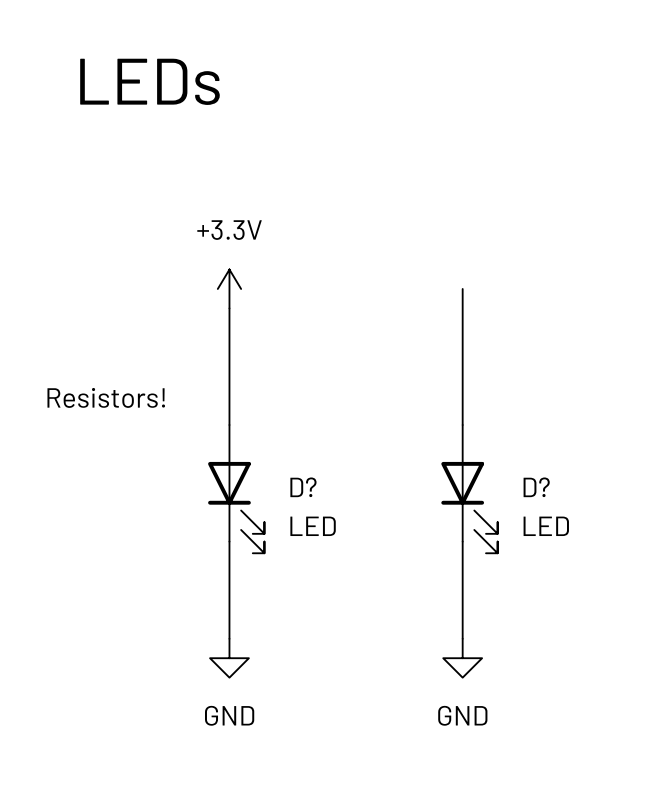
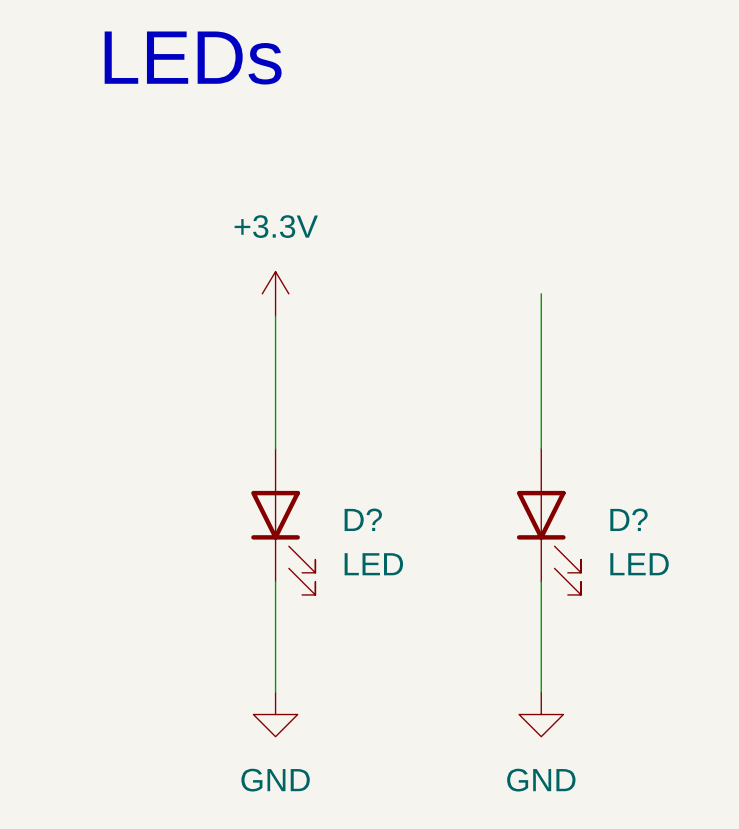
label: Resistors! (106, 397) -> none

